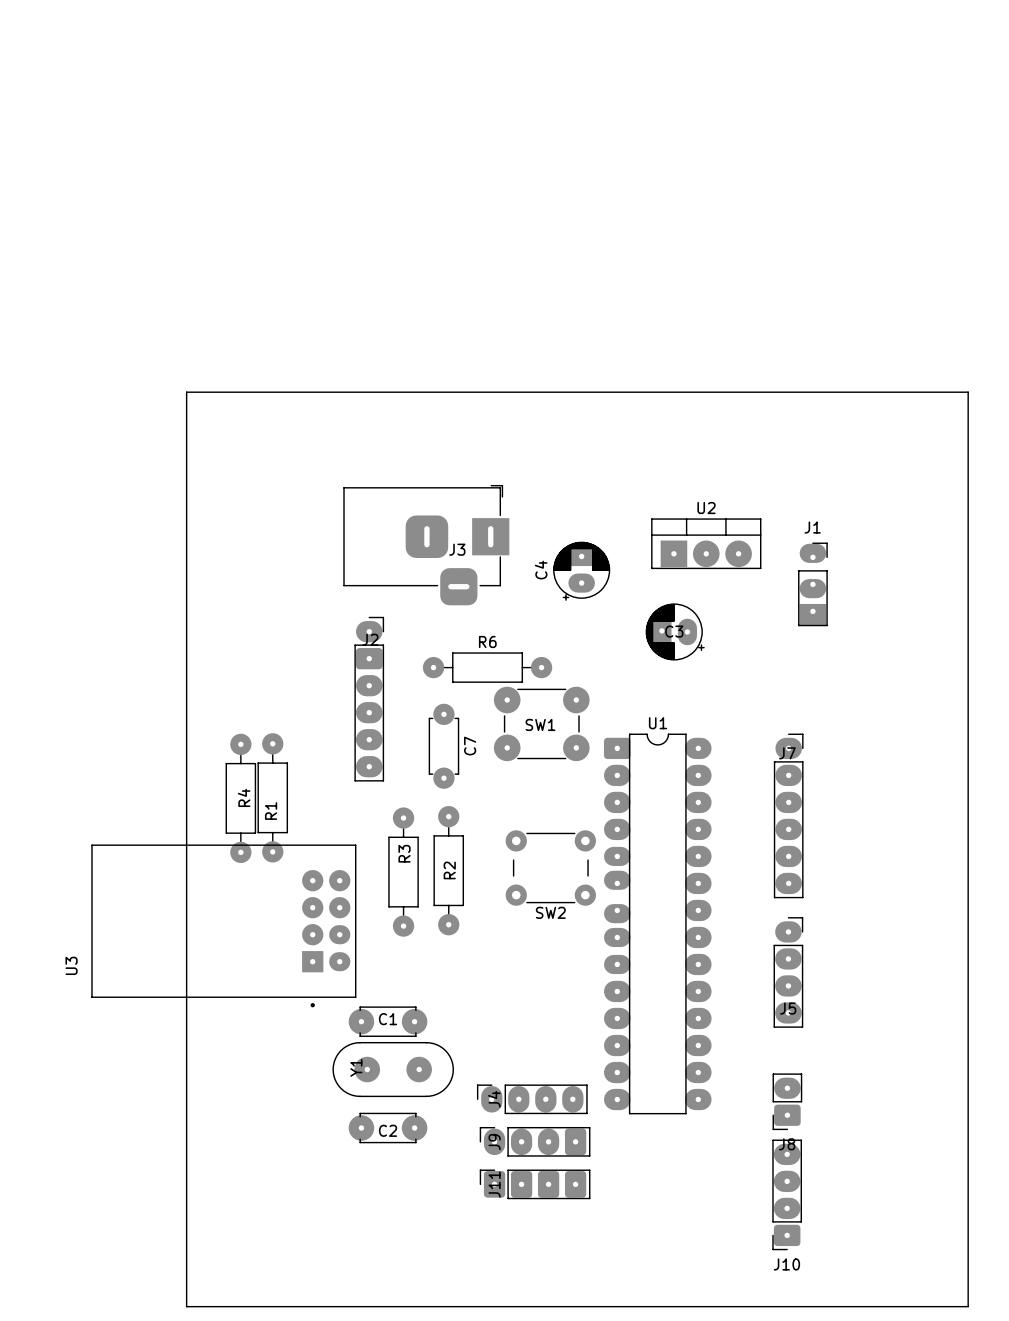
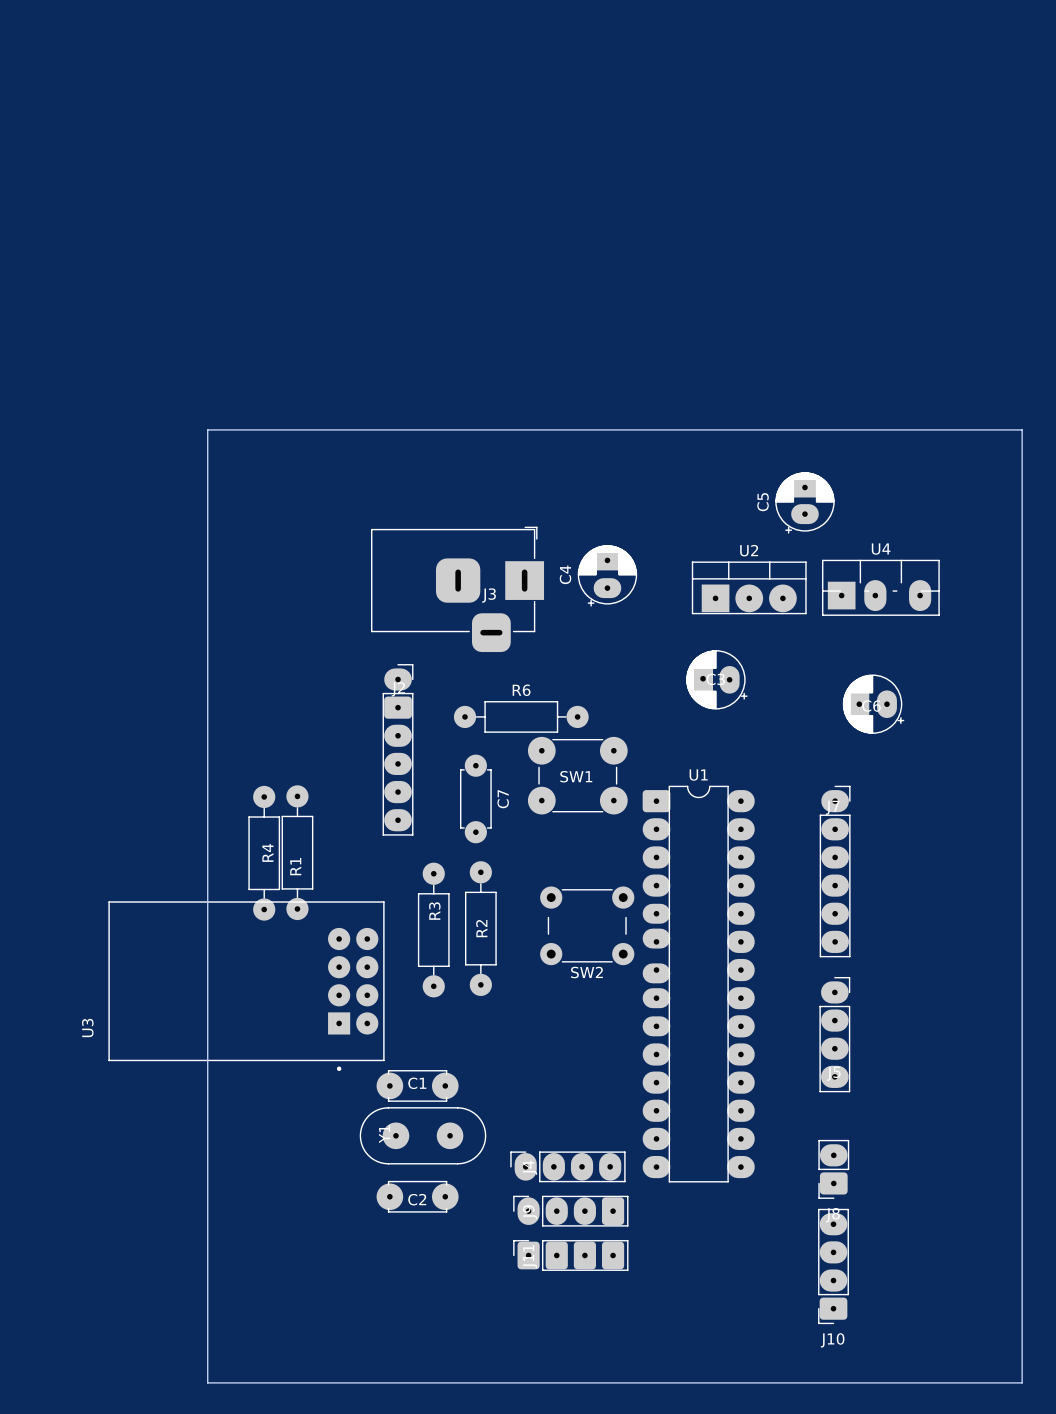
C5: none -> (804, 502)
U4: none -> (880, 587)
C4 position: (581, 571) -> (607, 575)
J1: (812, 584) -> none
part: none -> (873, 704)
U3 footprint: [91, 844, 357, 1008] -> [108, 901, 385, 1071]

